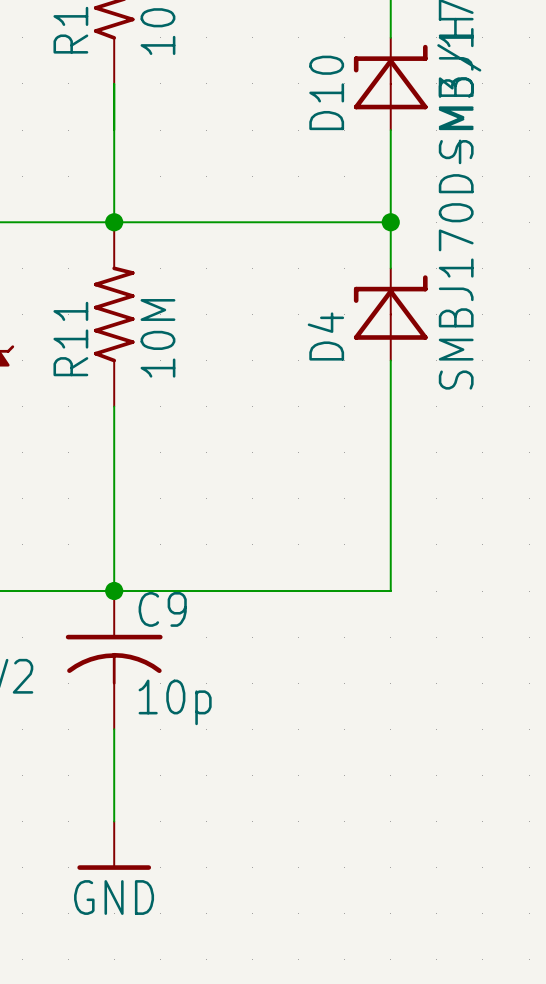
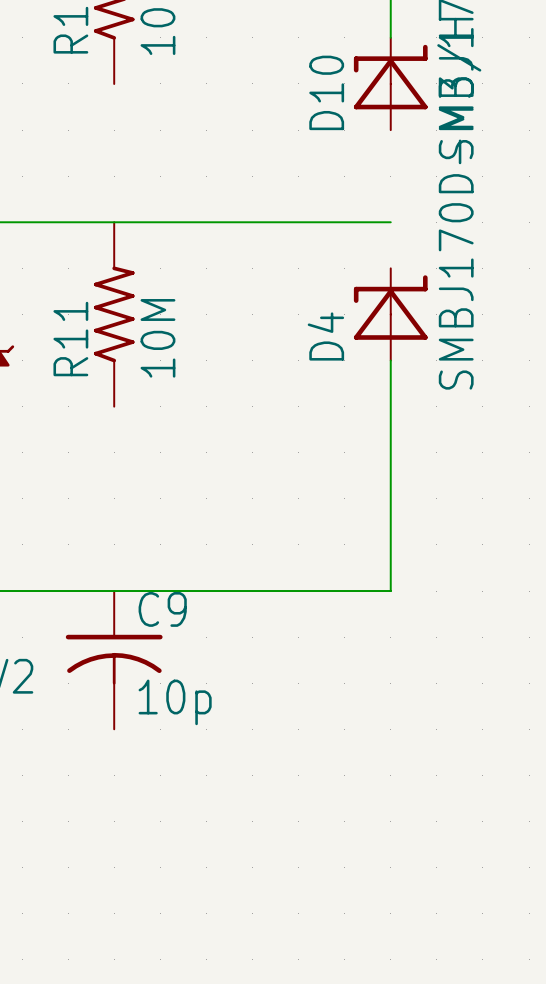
wire: (114, 83) (114, 222) -> none
wire: (390, 130) (390, 268) -> none
junction: (114, 222) -> none
junction: (390, 222) -> none
wire: (114, 406) (114, 591) -> none
junction: (114, 591) -> none
wire: (114, 729) (114, 821) -> none
power symbol: GND (114, 845) -> none

